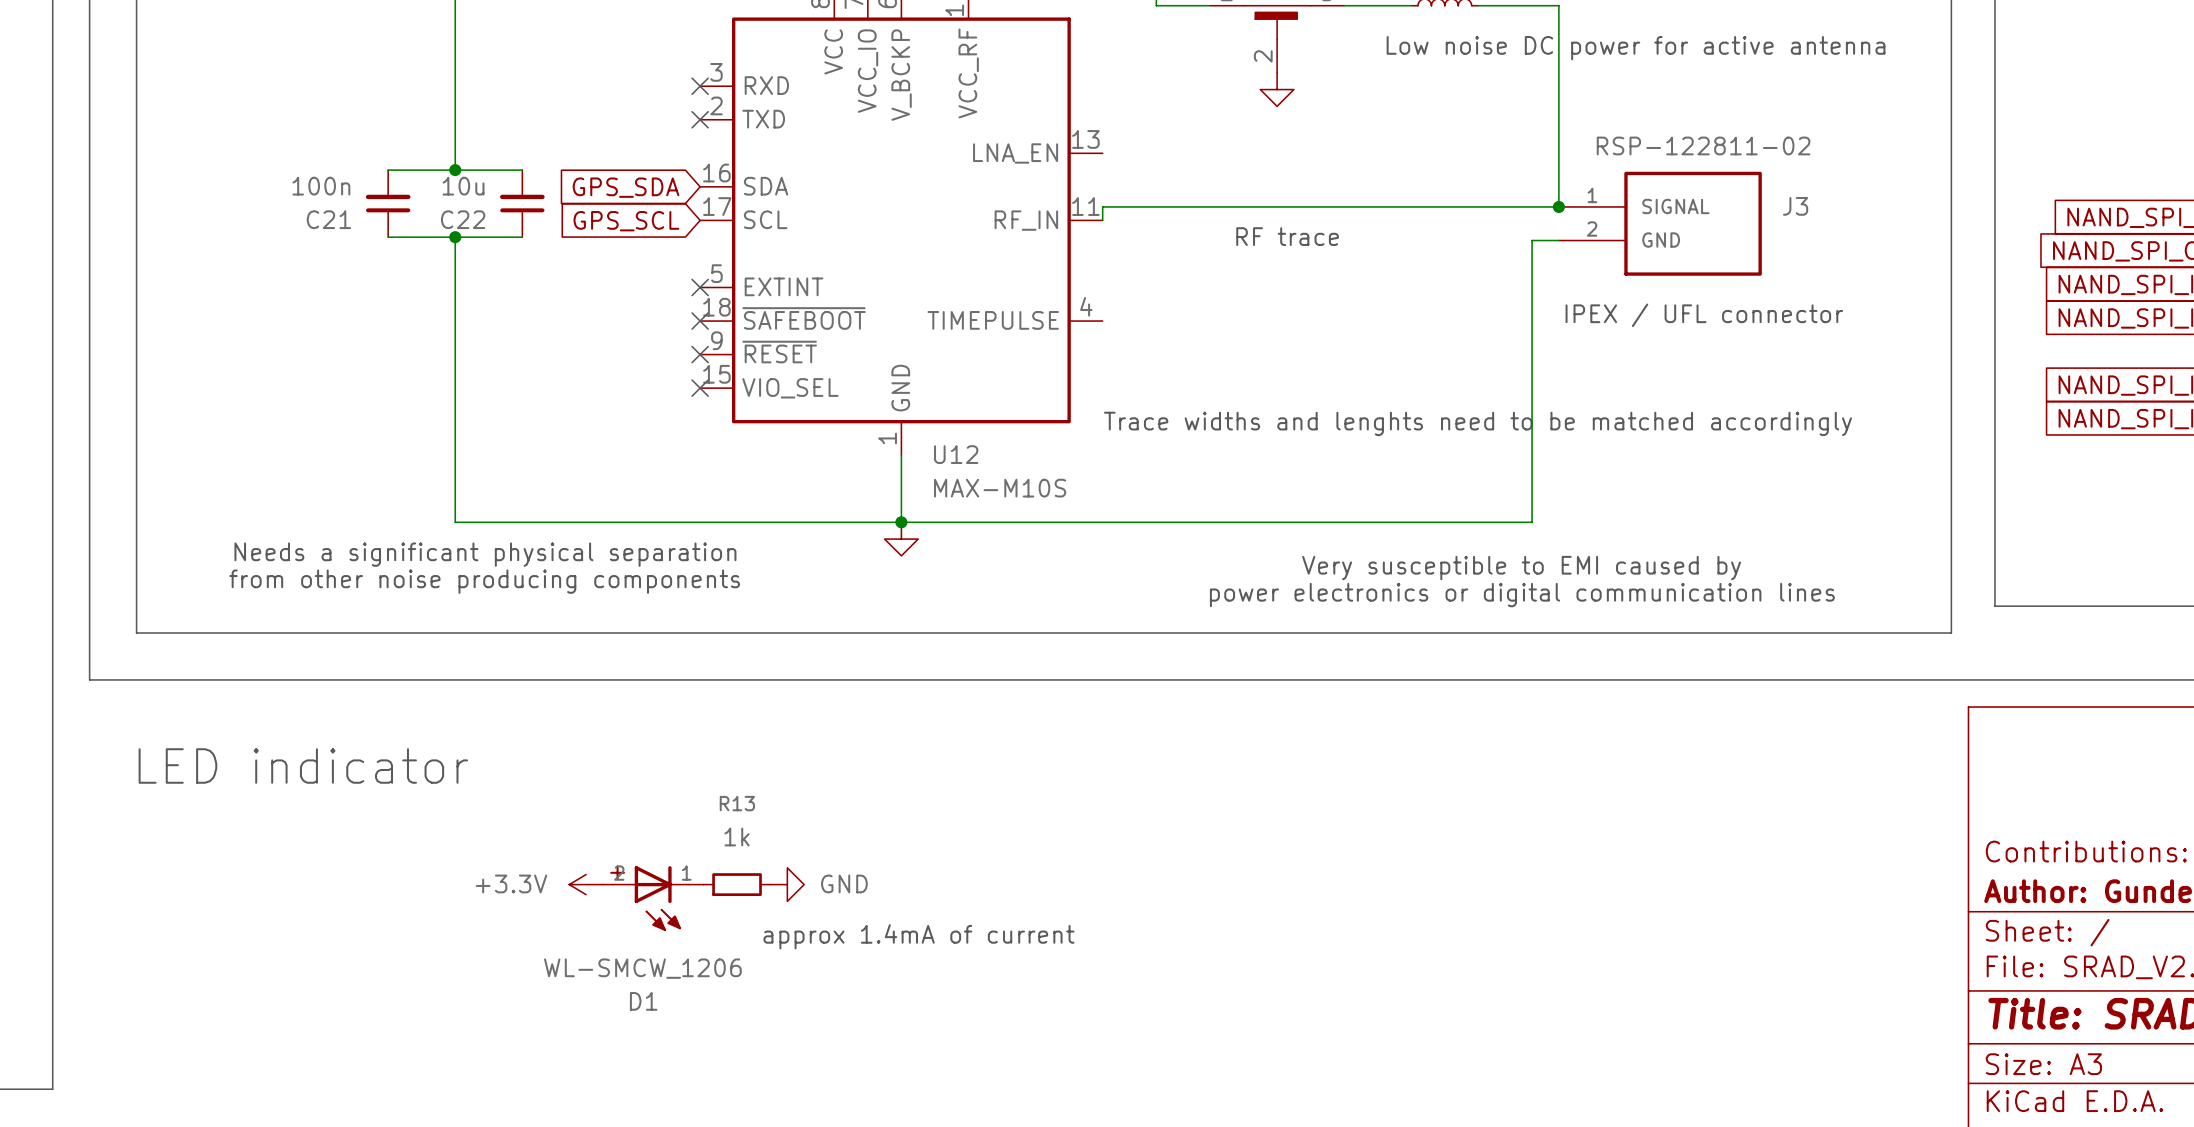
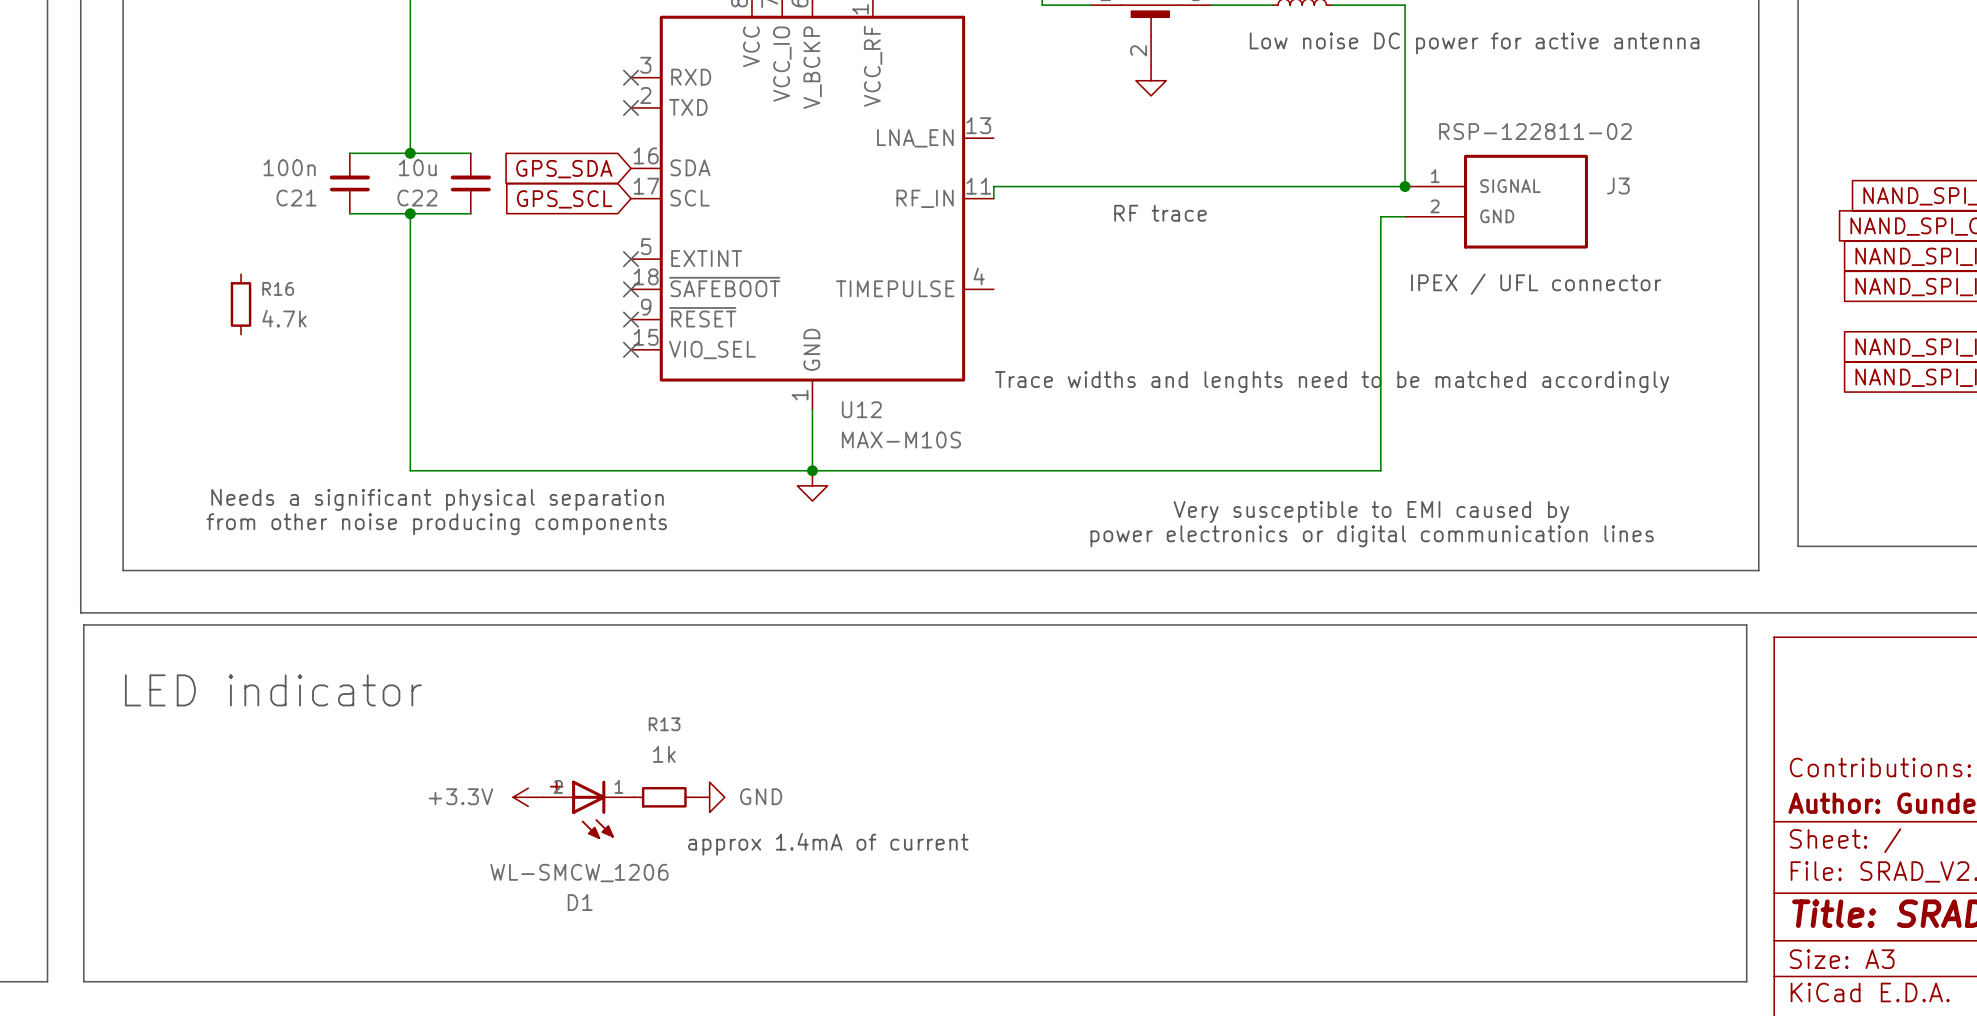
R16: none -> 4.7k (241, 304)
line: none -> (83, 624) (1746, 624) (1746, 981) (83, 981) (83, 624)

